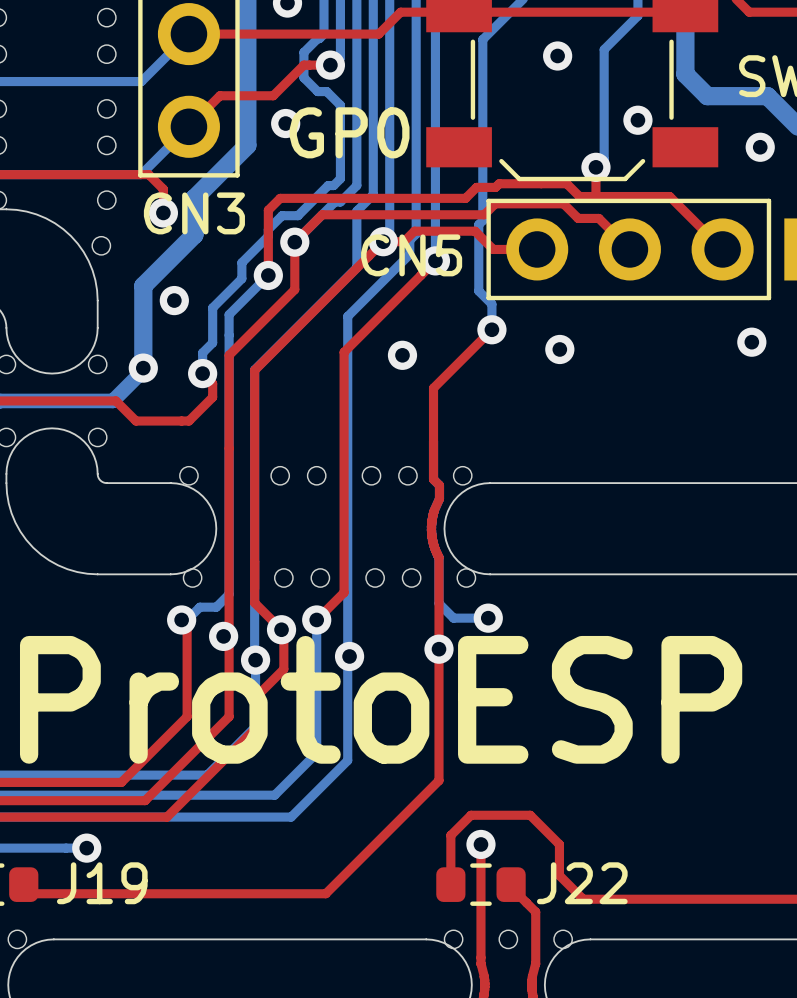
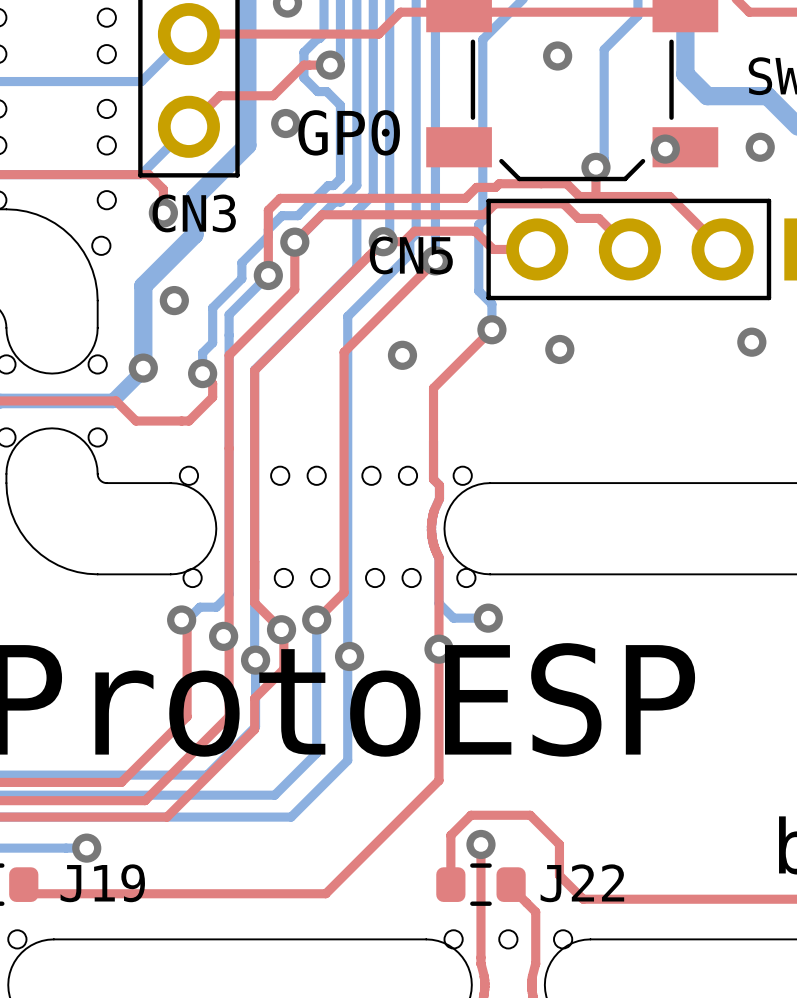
via position: (637, 120) -> (665, 149)

